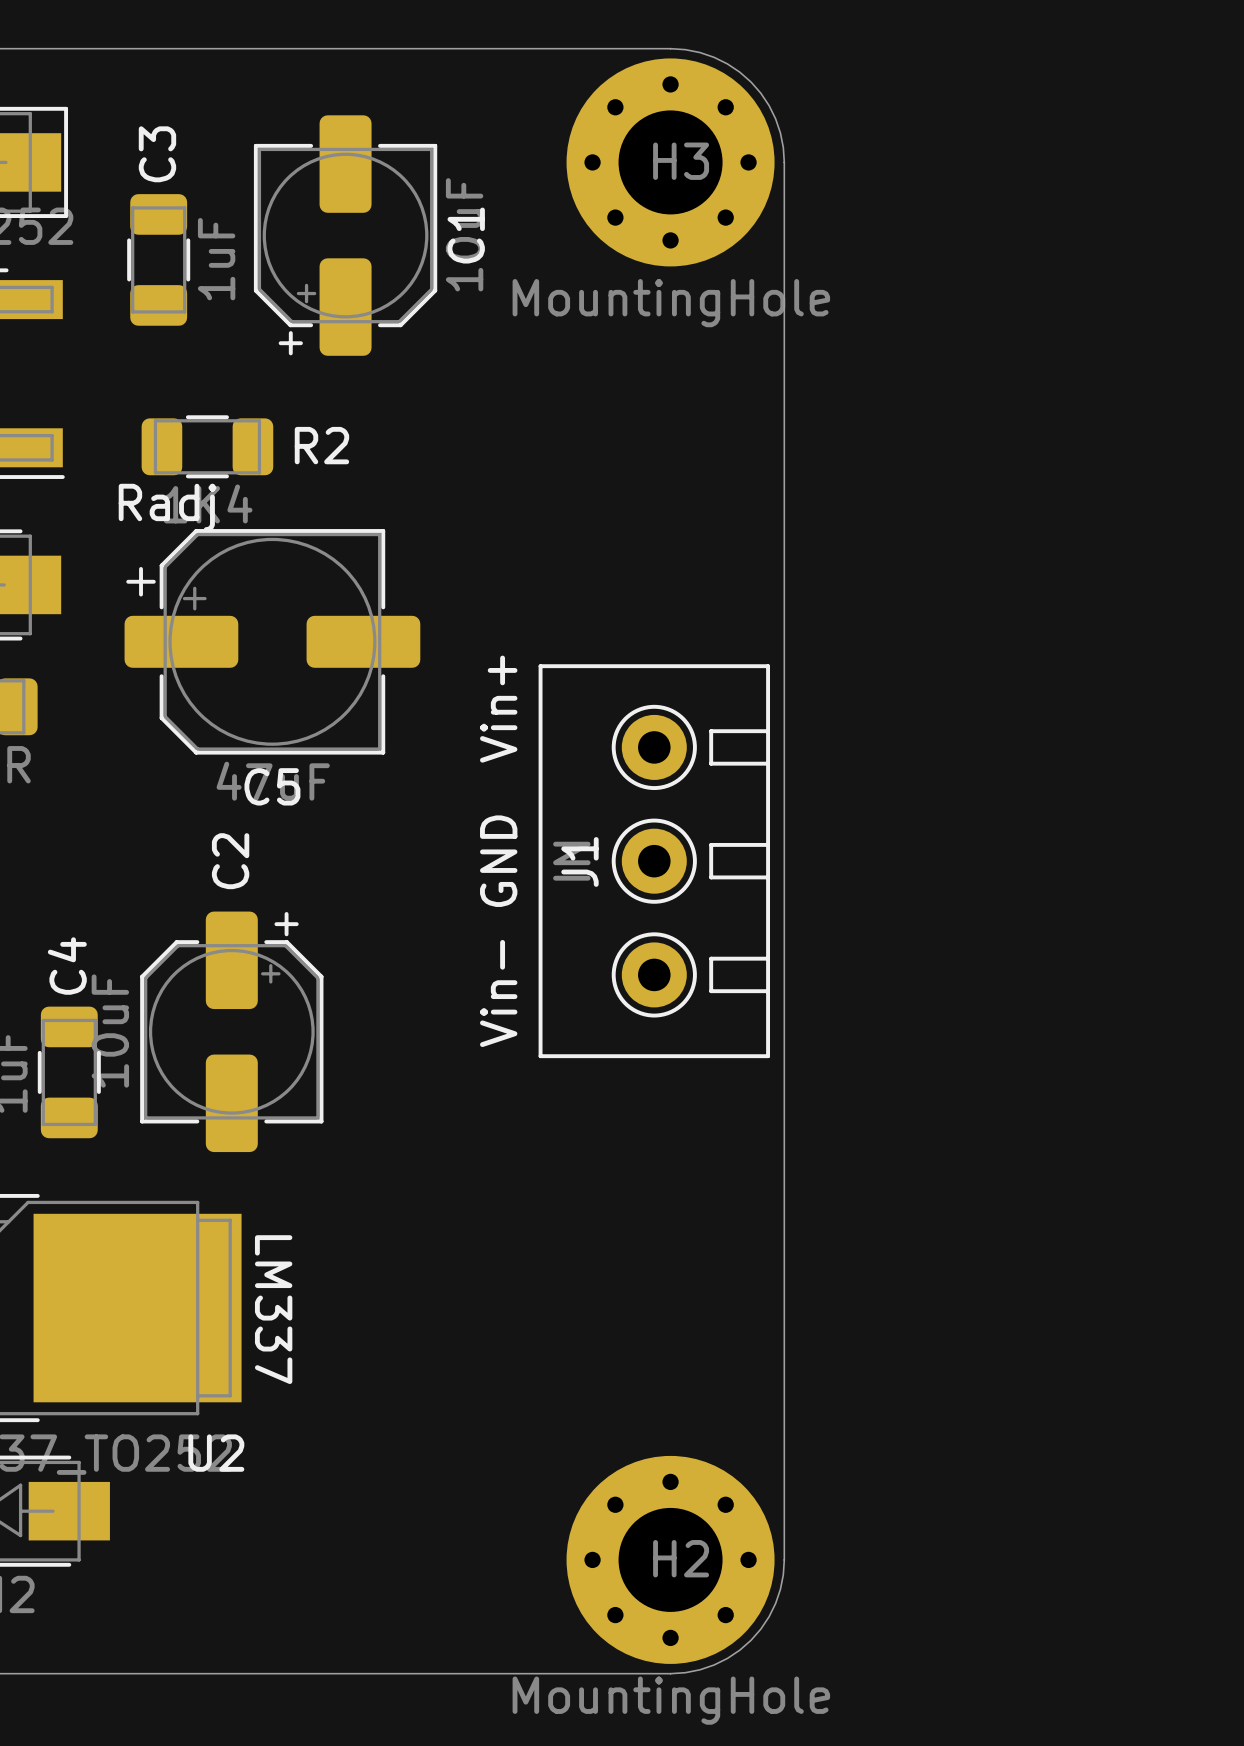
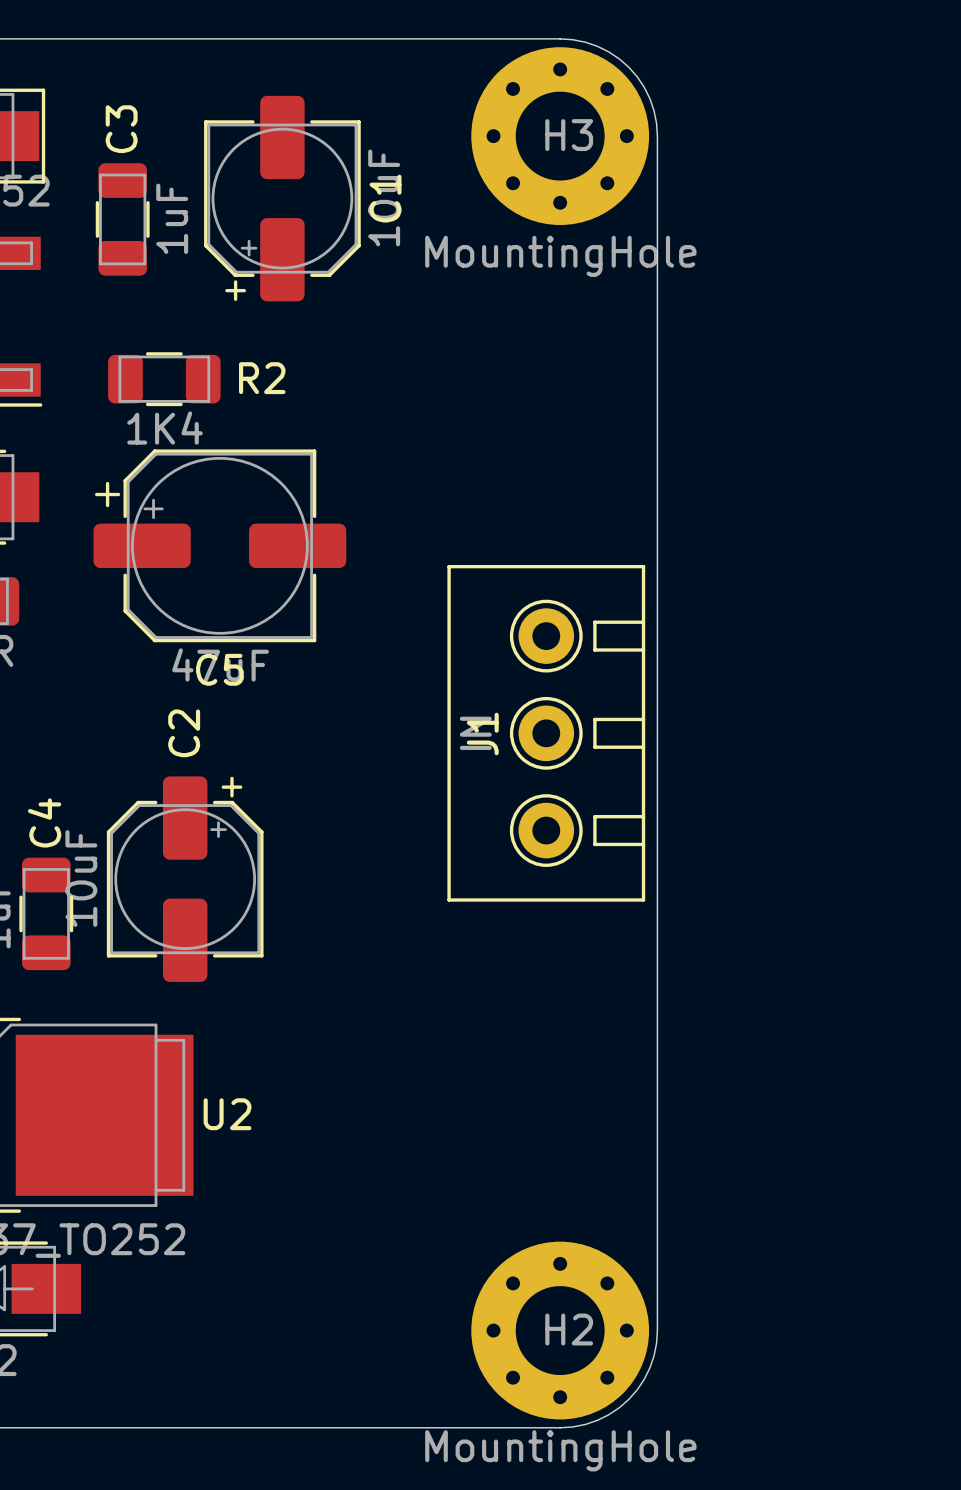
text: Radj (167, 507) -> none
text: Vin+ (498, 709) -> none
text: GND (498, 861) -> none
text: Vin- (498, 993) -> none
text: LM337 (273, 1309) -> none
U2 name position: U2 (216, 1453) -> U2 (227, 1114)

